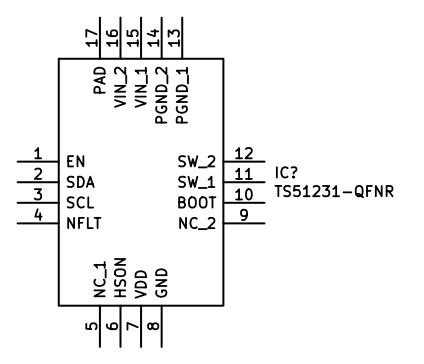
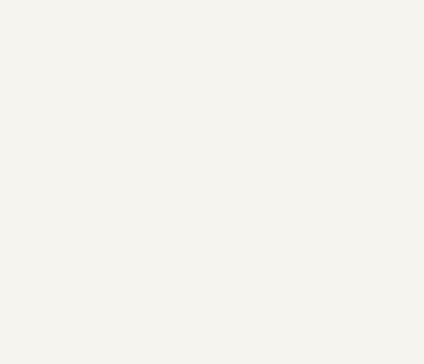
IC?: TS51231-QFNR (141, 182) -> none

